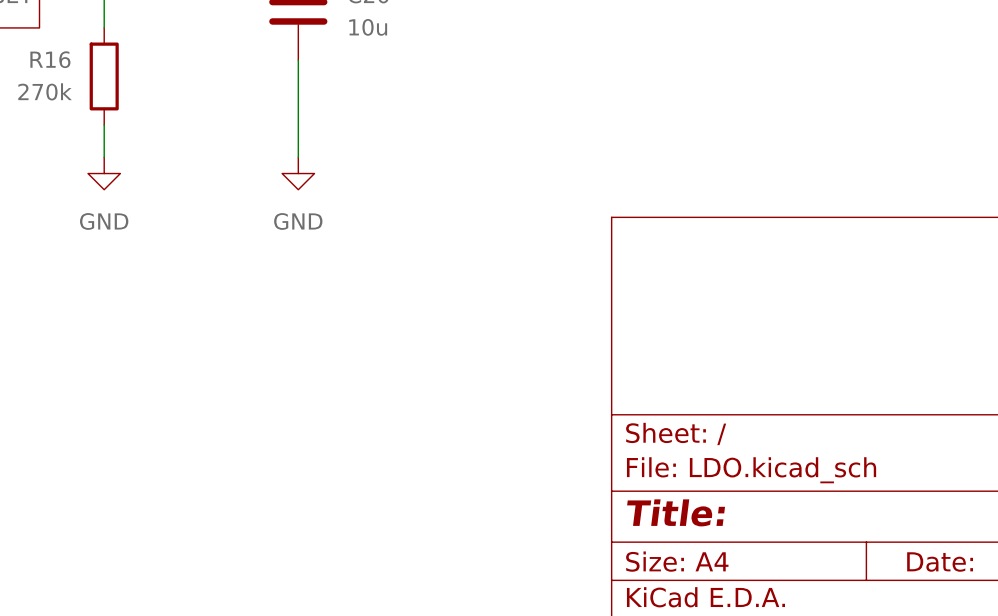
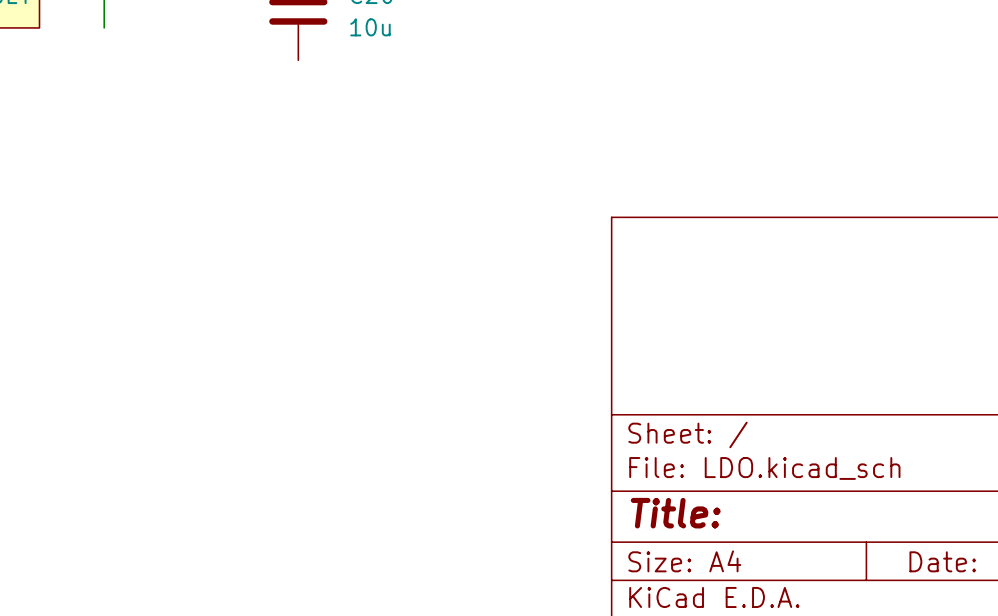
wire: (298, 60) (298, 157) -> none
R16: 270k (104, 76) -> none
wire: (104, 125) (104, 157) -> none
power symbol: GND (104, 173) -> none
power symbol: GND (298, 173) -> none

